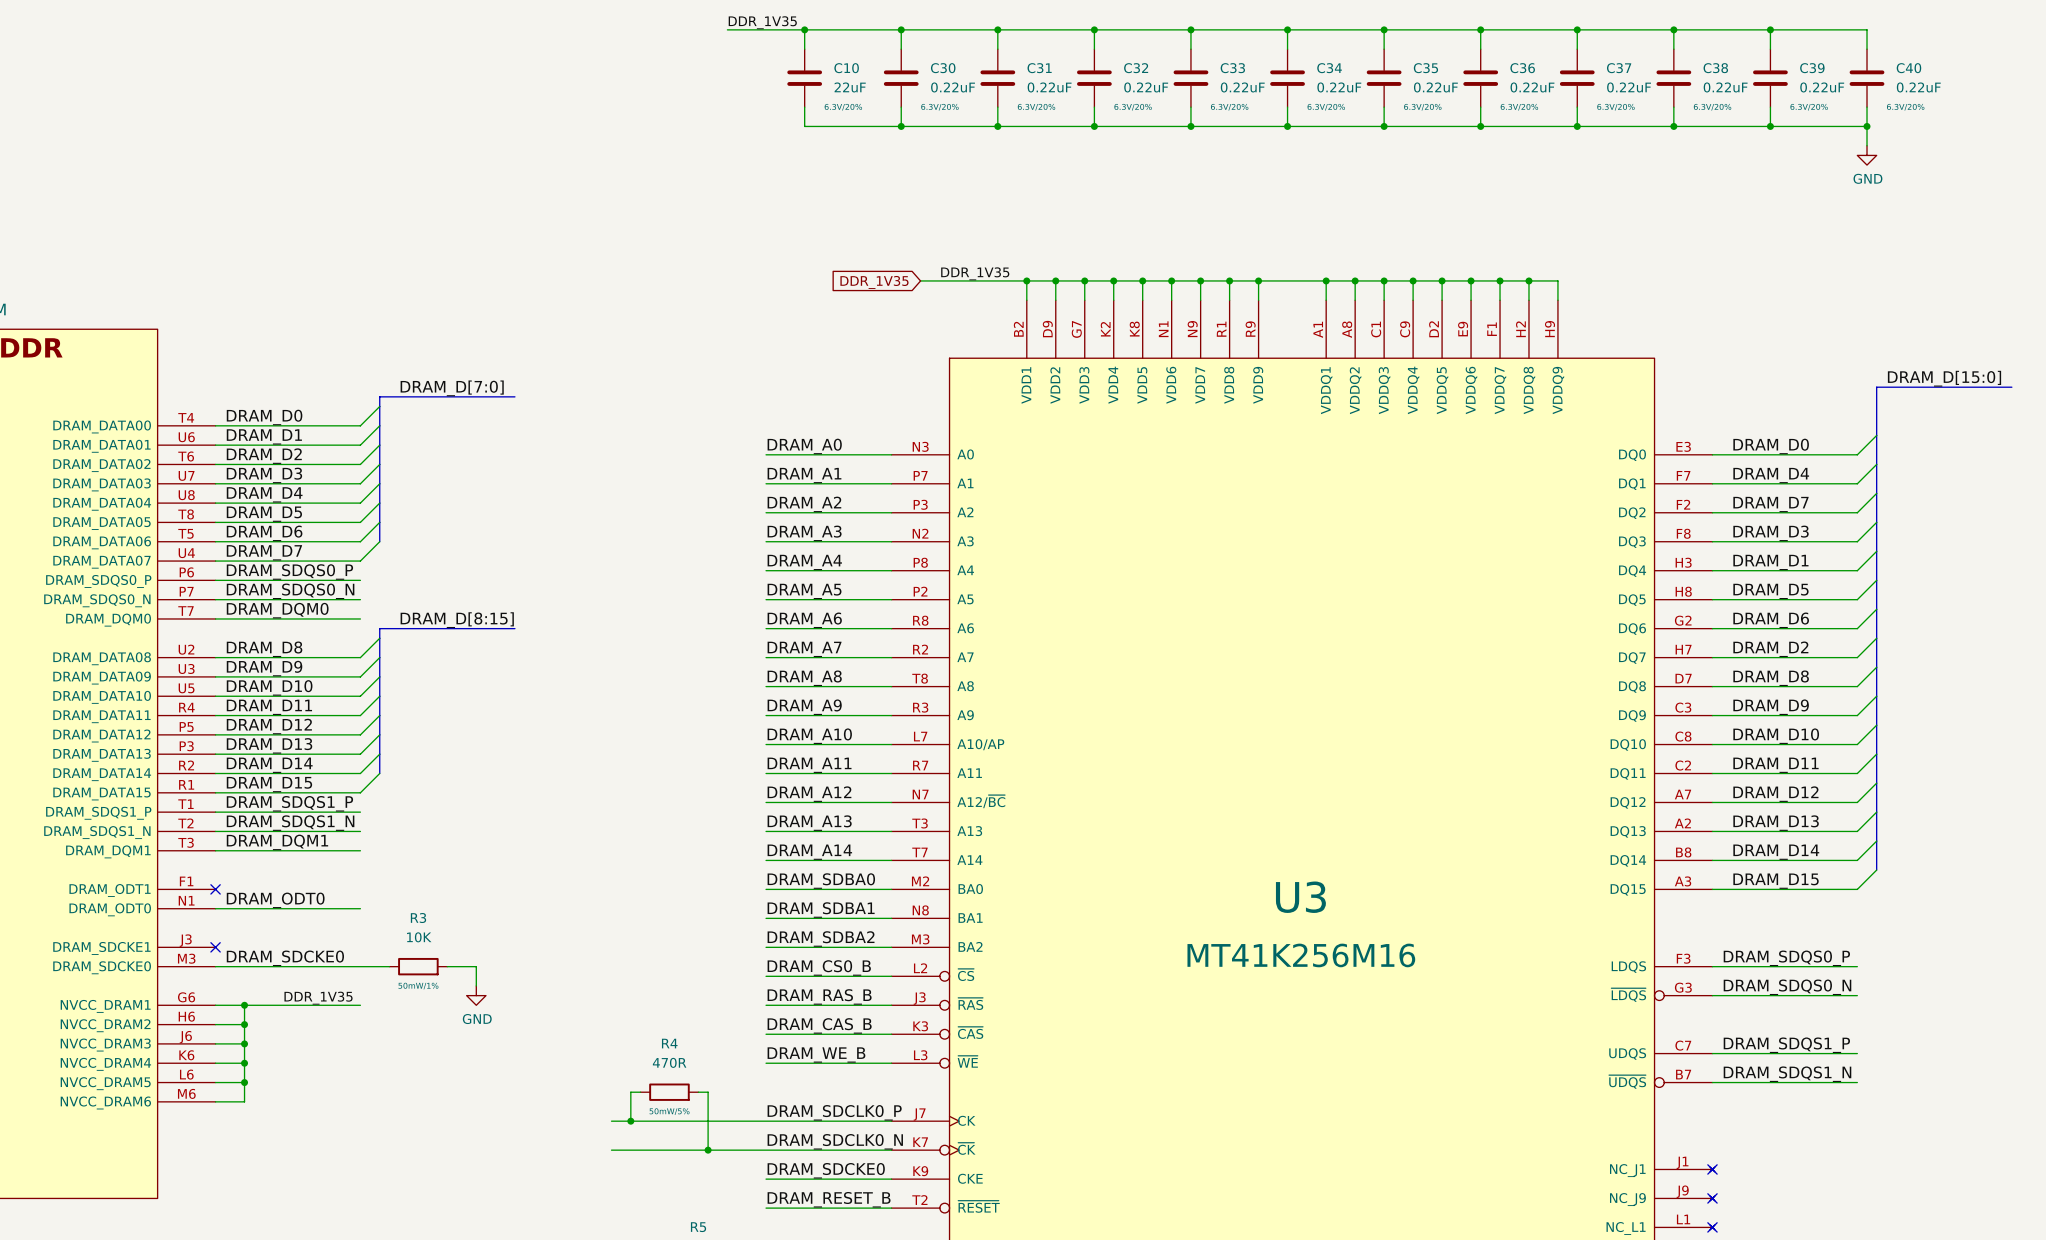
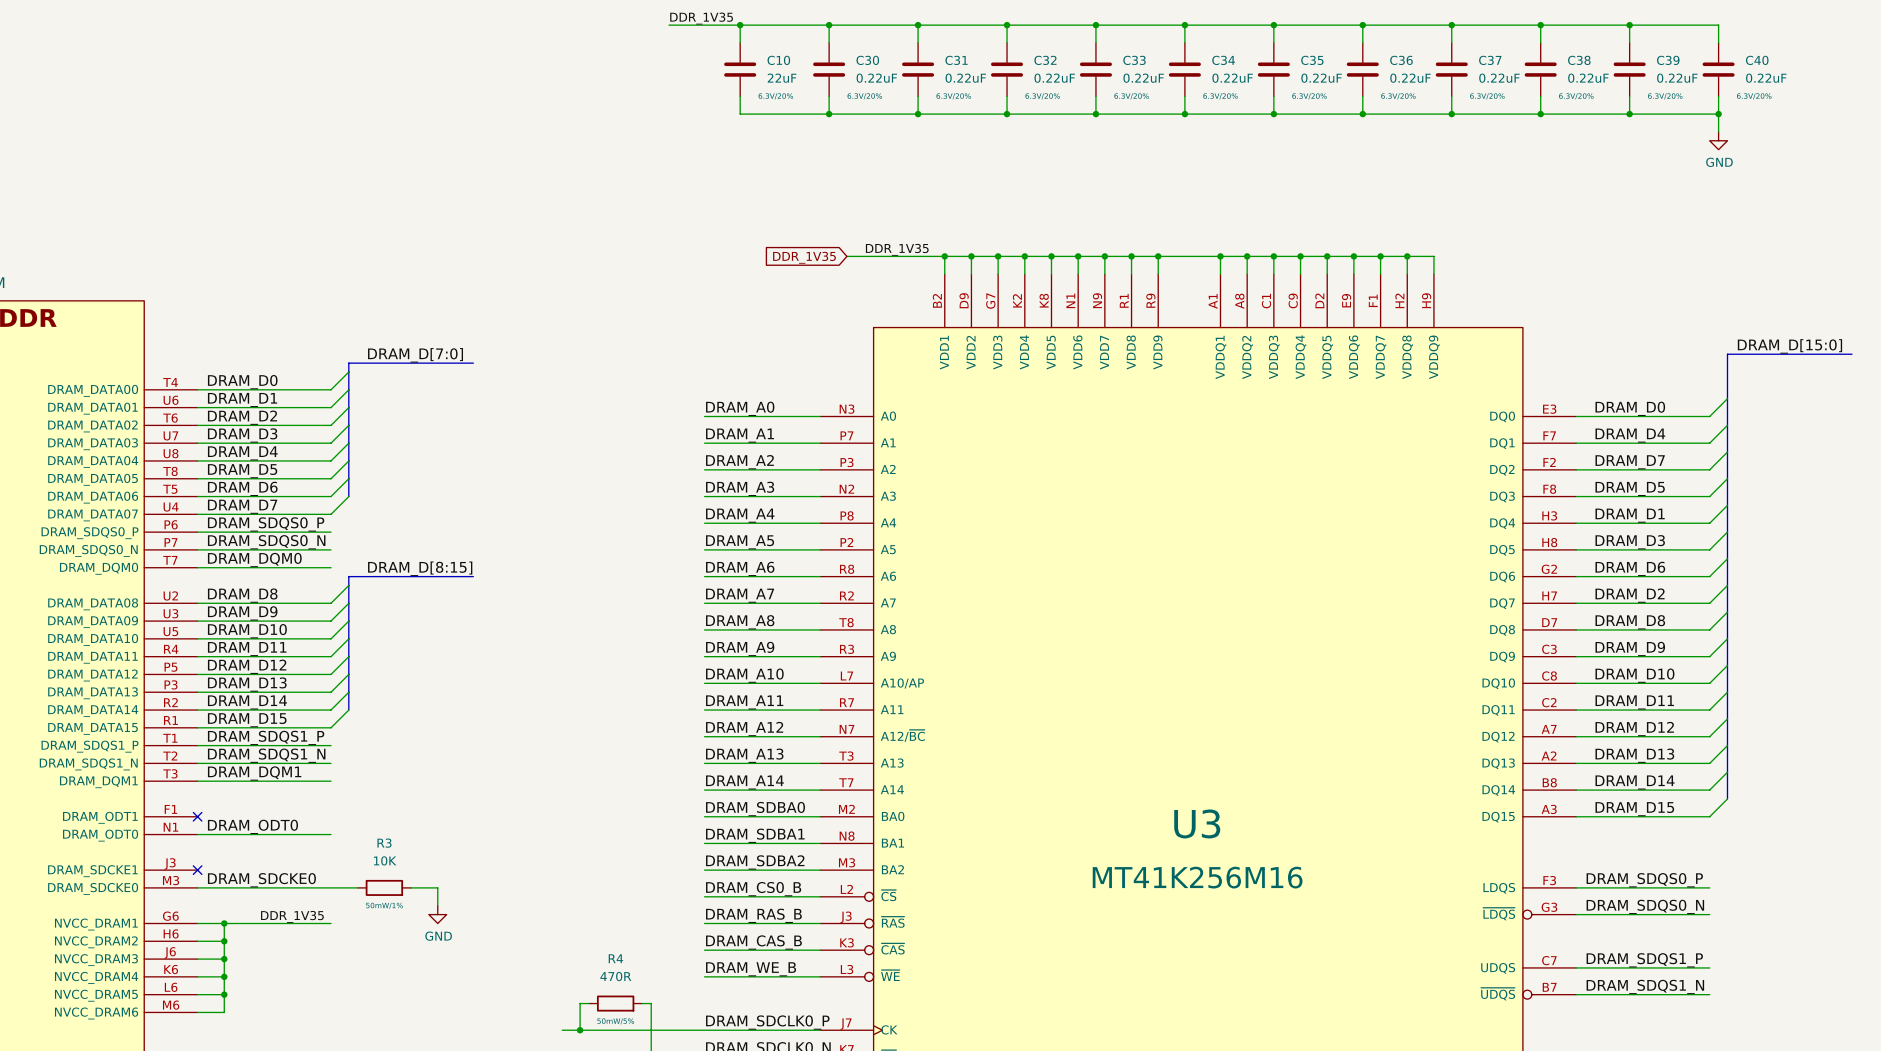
label: DRAM_D3 (1771, 533) -> DRAM_D5 (1630, 488)
label: DRAM_D5 (1770, 591) -> DRAM_D3 (1630, 542)

